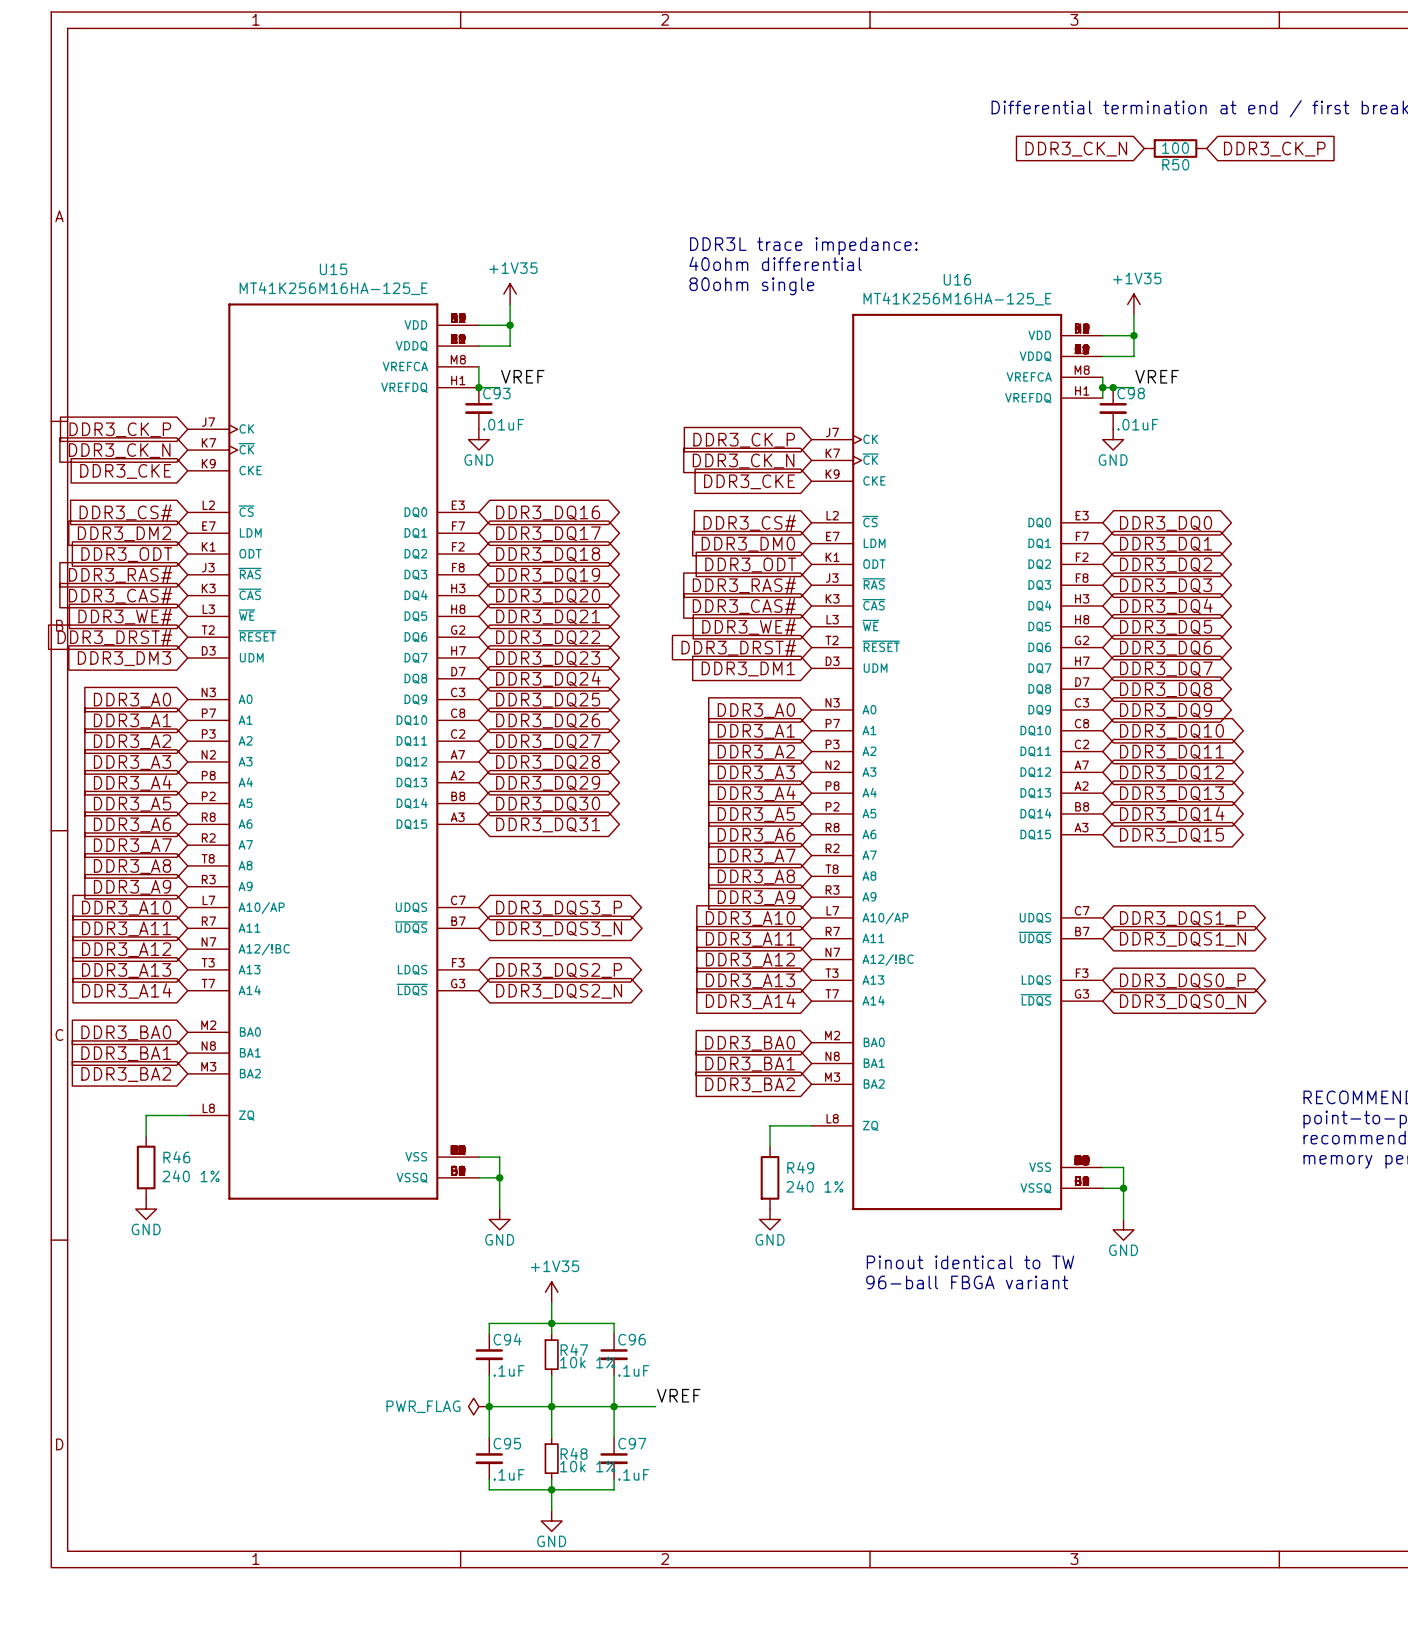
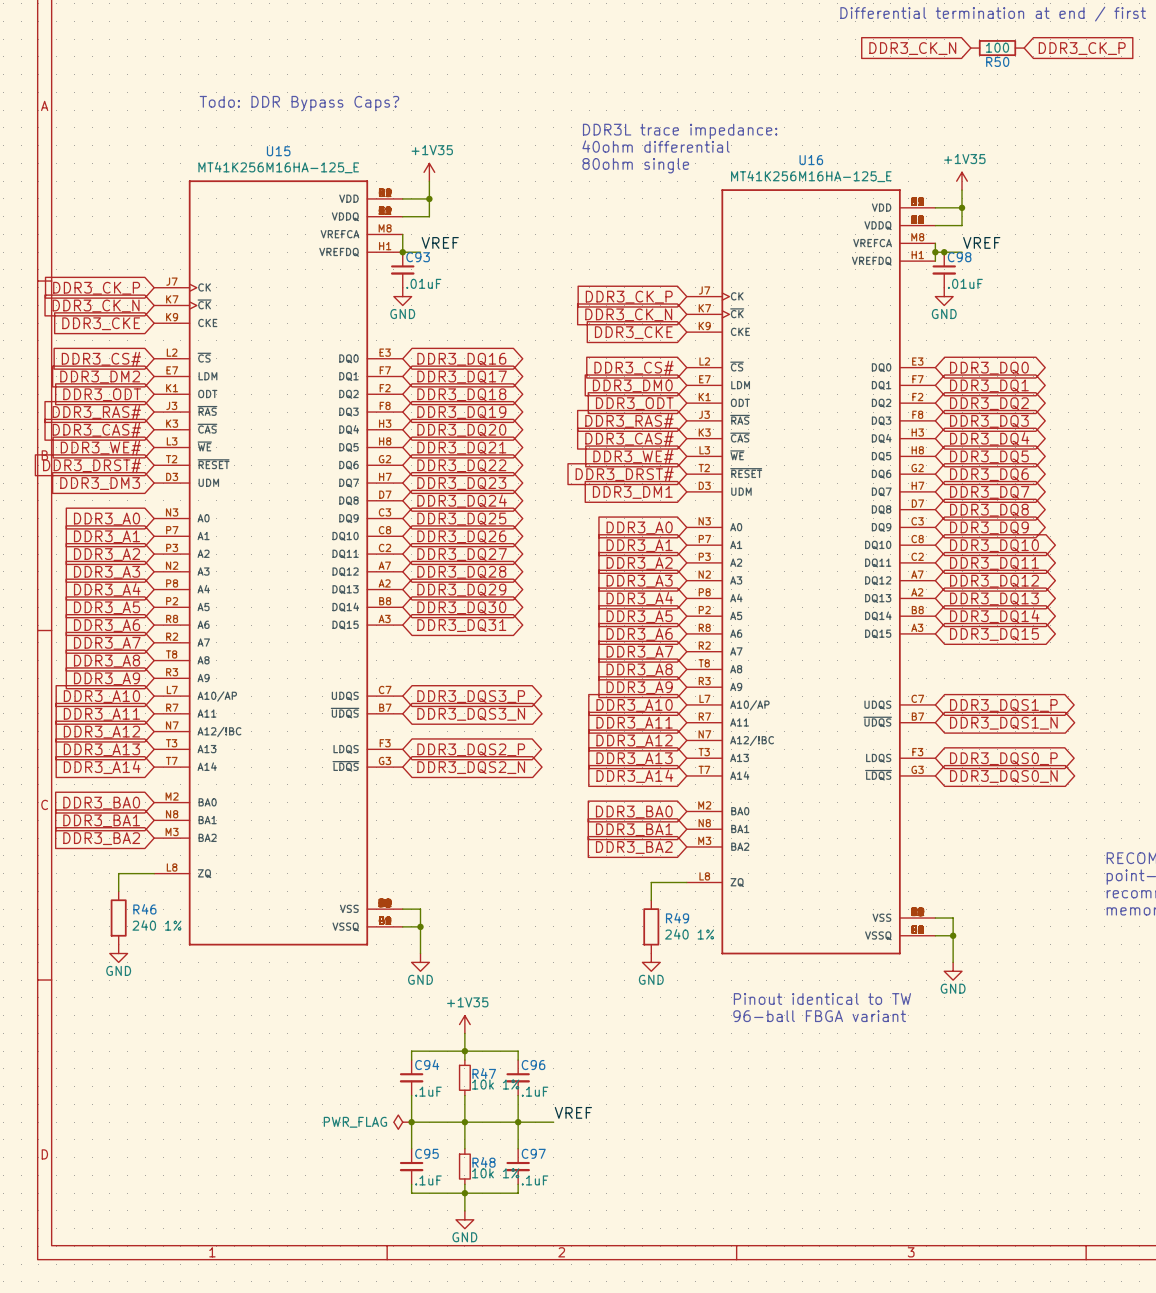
text: none -> Todo: DDR Bypass Caps? (299, 103)

